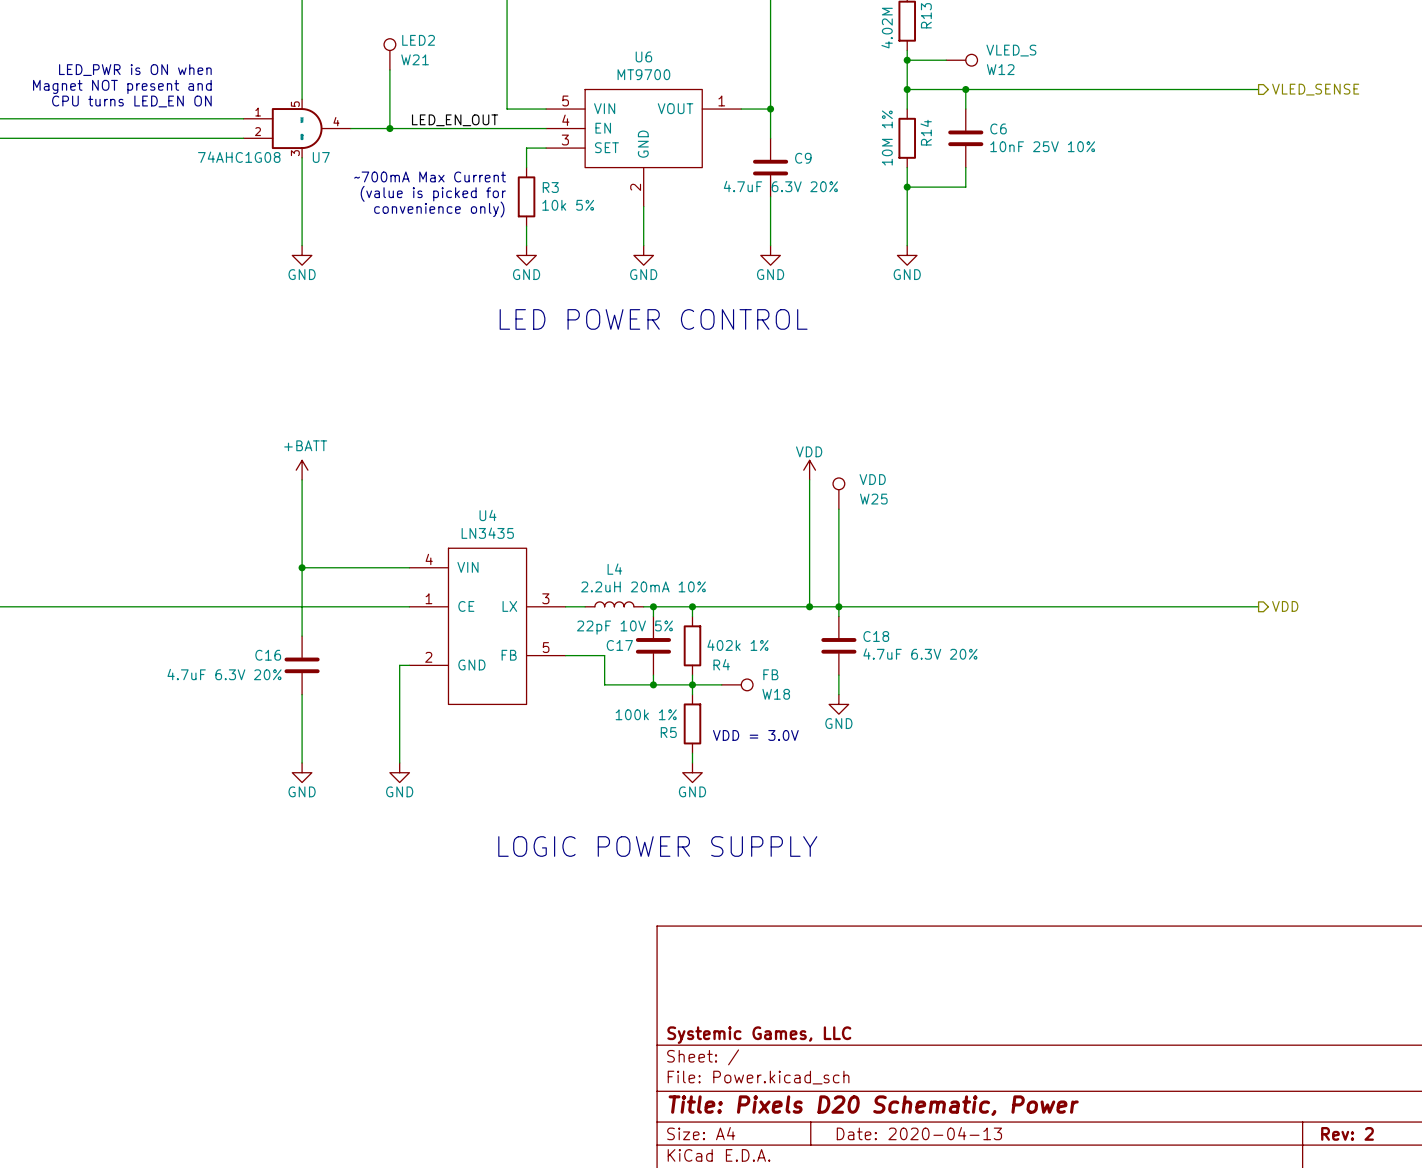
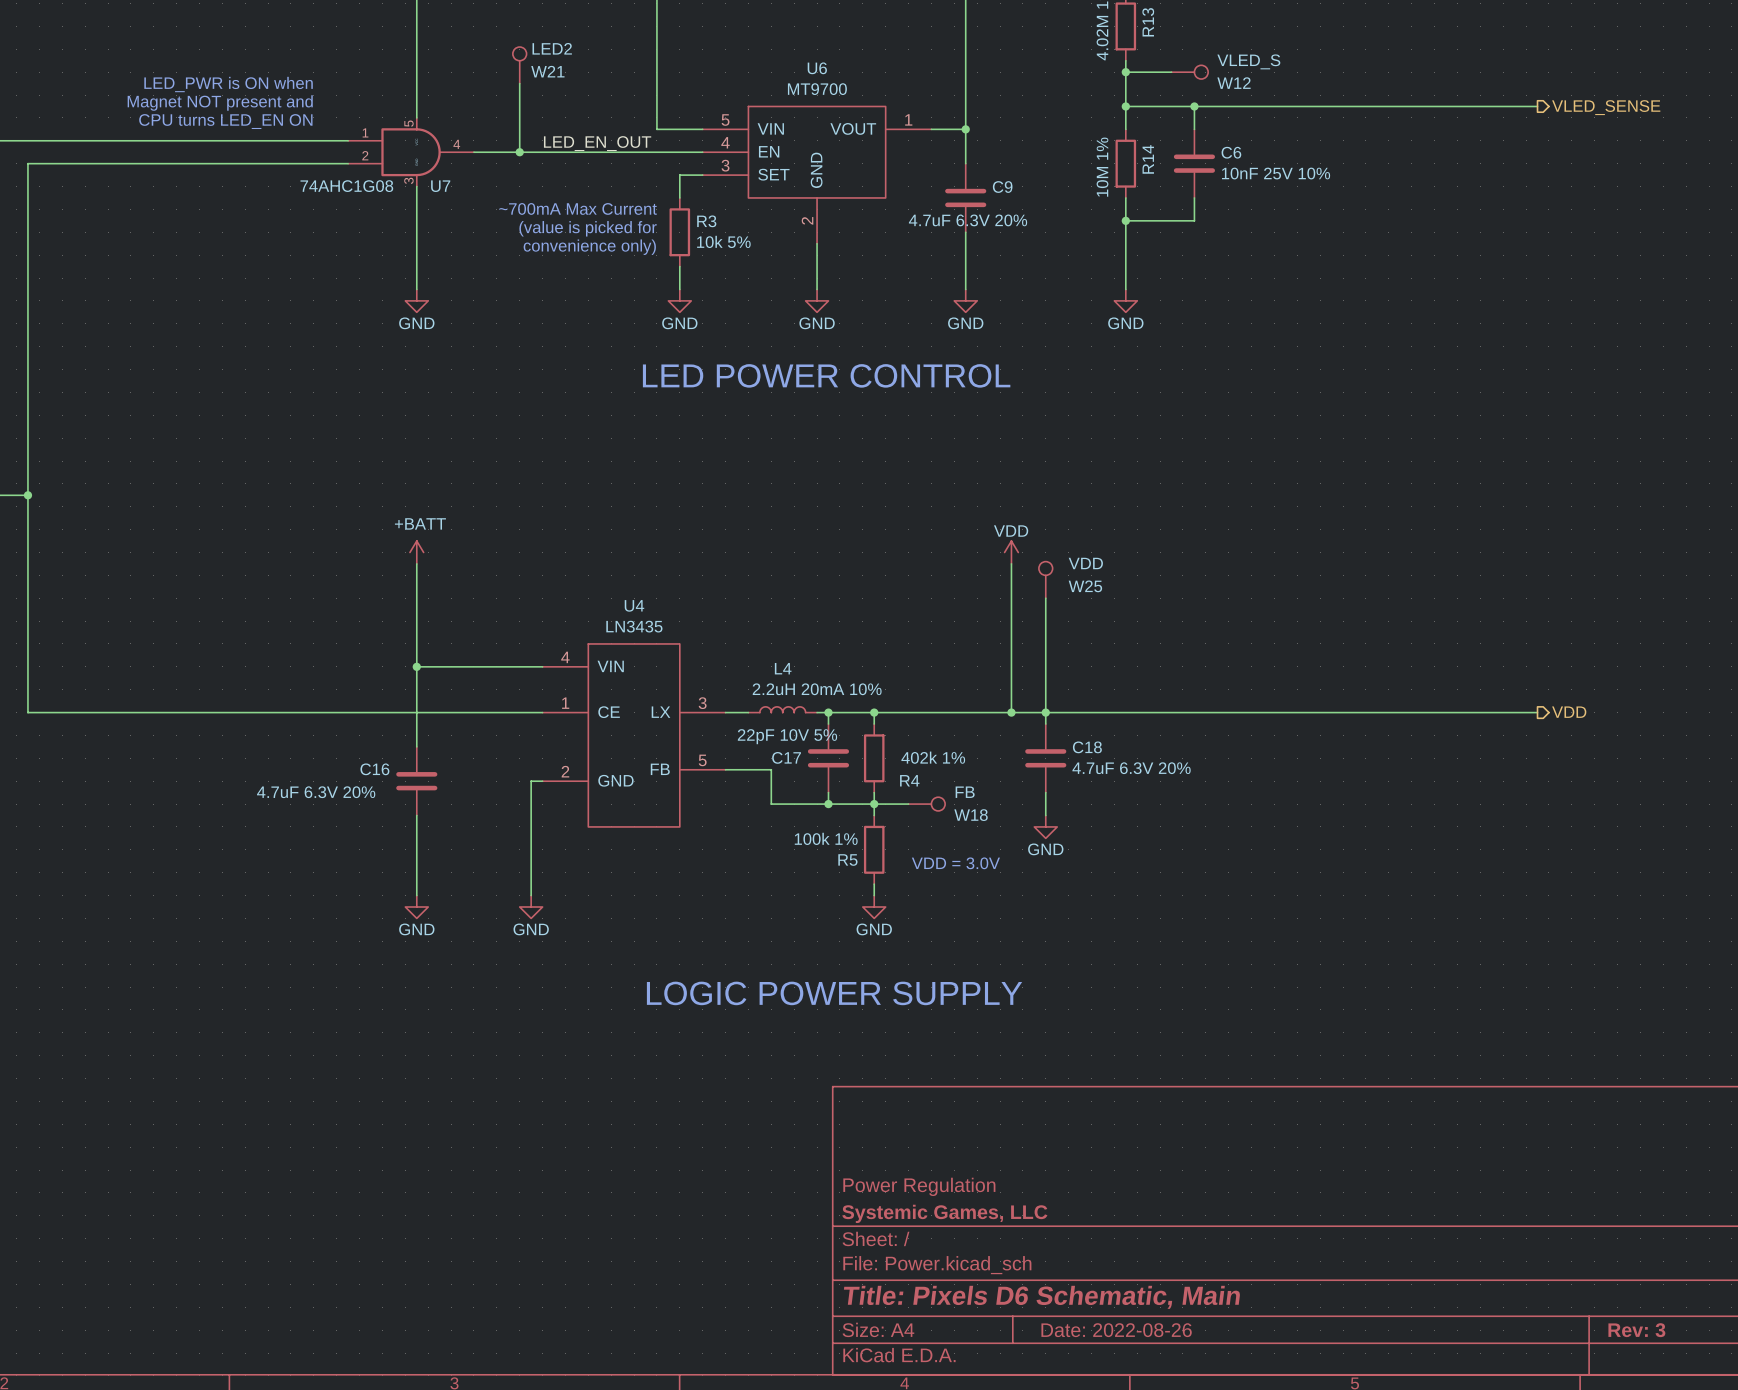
title block: none -> Power Regulation (919, 1186)
title block: Title: Pixels D20 Schematic, Power (873, 1105) -> Title: Pixels D6 Schematic, Main (1042, 1297)
title block: Date: 2020-04-13 (919, 1133) -> Date: 2022-08-26 (1116, 1330)
title block: Rev: 2 (1347, 1133) -> Rev: 3 (1636, 1330)

